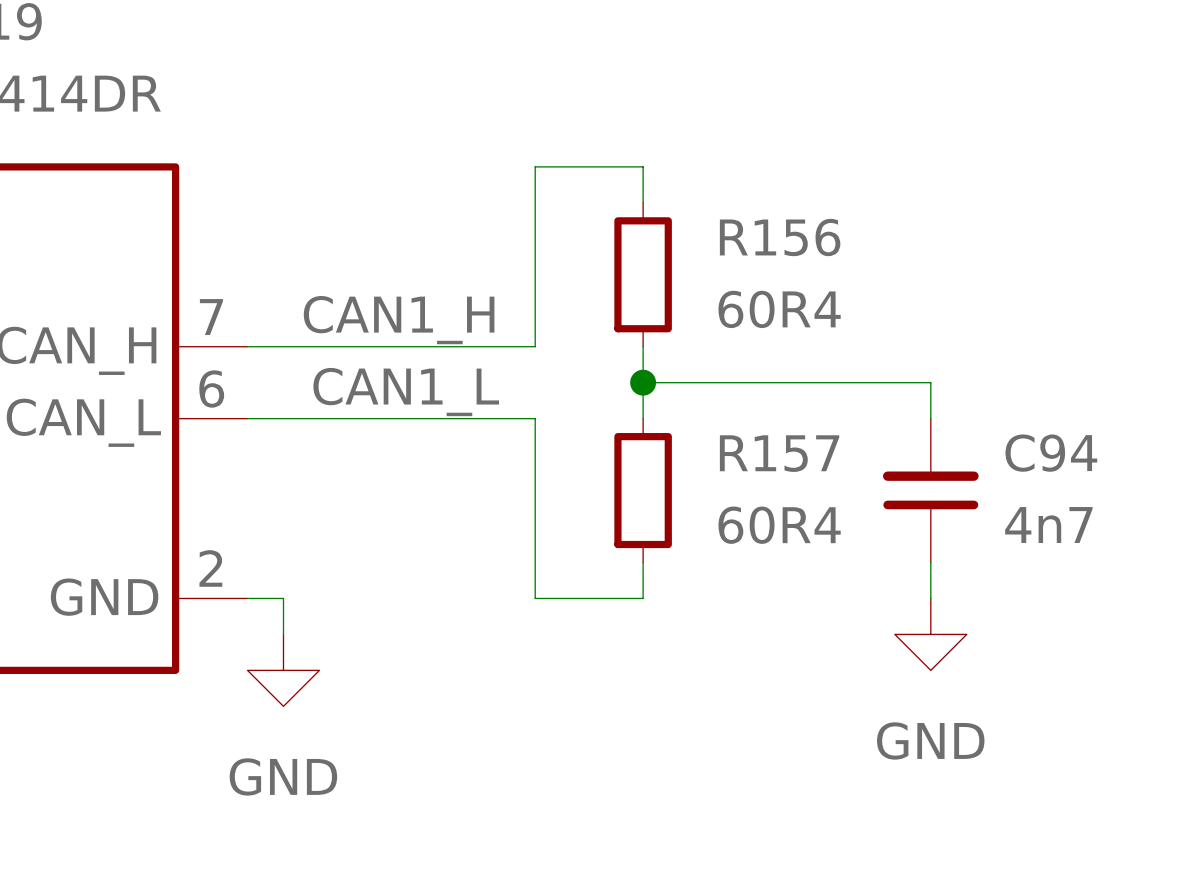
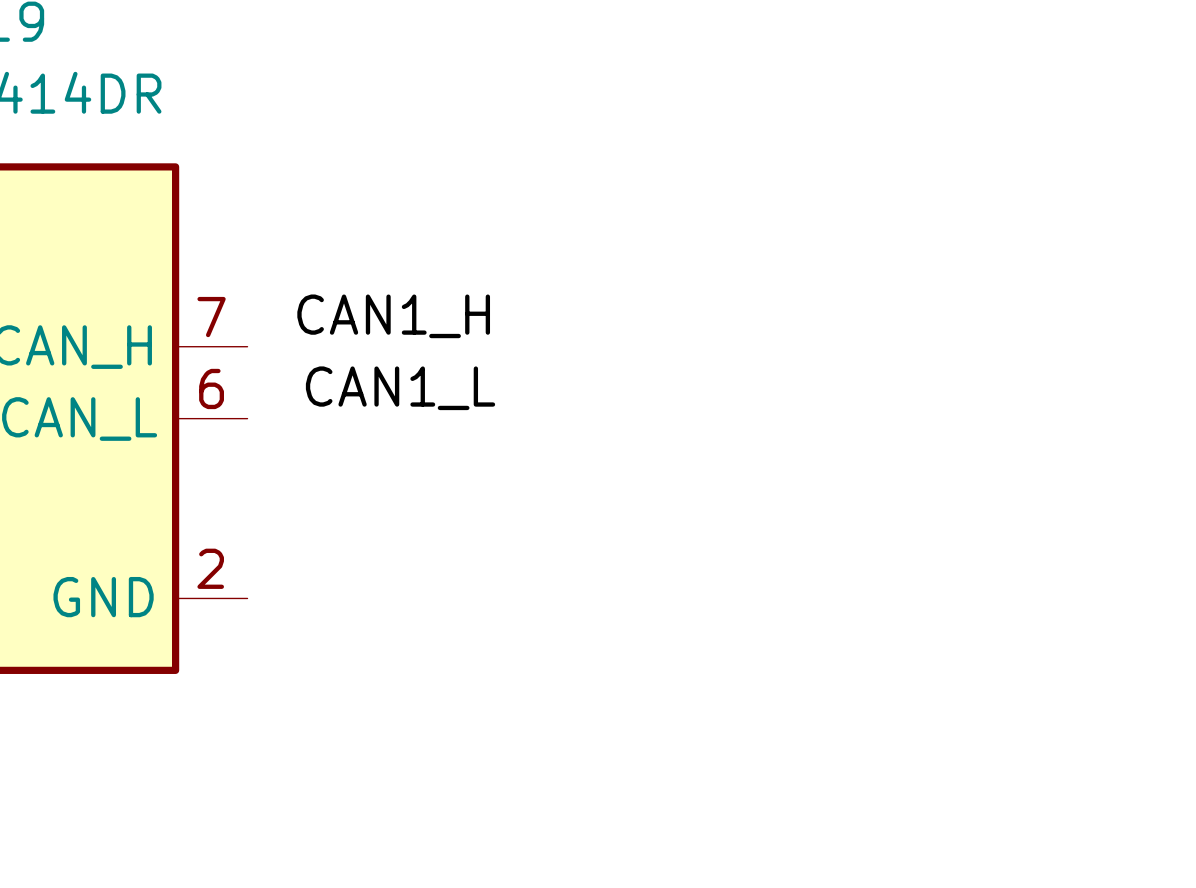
wire: (643, 202) (643, 166) (535, 166) (535, 346) (247, 346) -> none
R156: (643, 274) -> none
wire: (643, 346) (643, 418) -> none
wire: (643, 382) (930, 382) (930, 418) -> none
junction: (643, 382) -> none
wire: (247, 418) (535, 418) (535, 598) (643, 598) (643, 562) -> none
R157: (643, 490) -> none
C94: (930, 490) -> none
wire: (930, 562) (930, 598) -> none
wire: (247, 598) (283, 598) (283, 634) -> none
power symbol: GND (930, 634) -> none
power symbol: GND (283, 670) -> none

